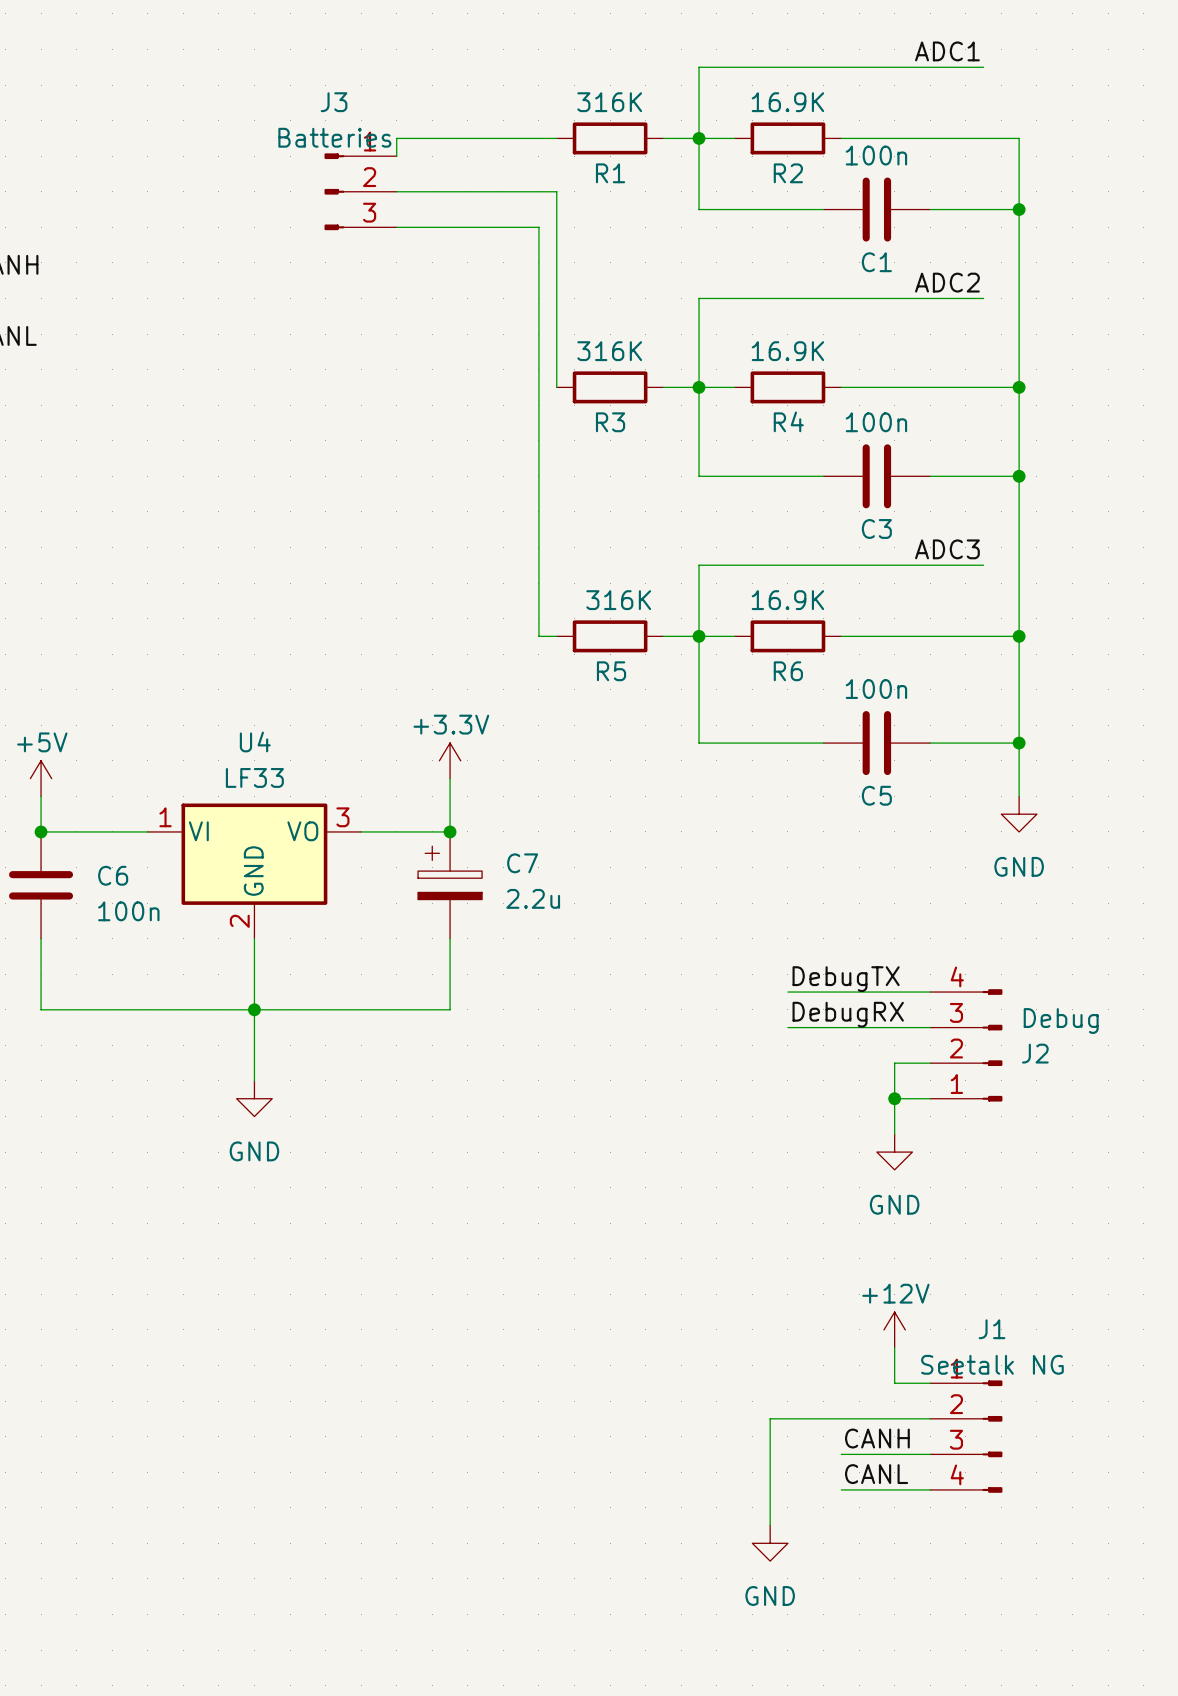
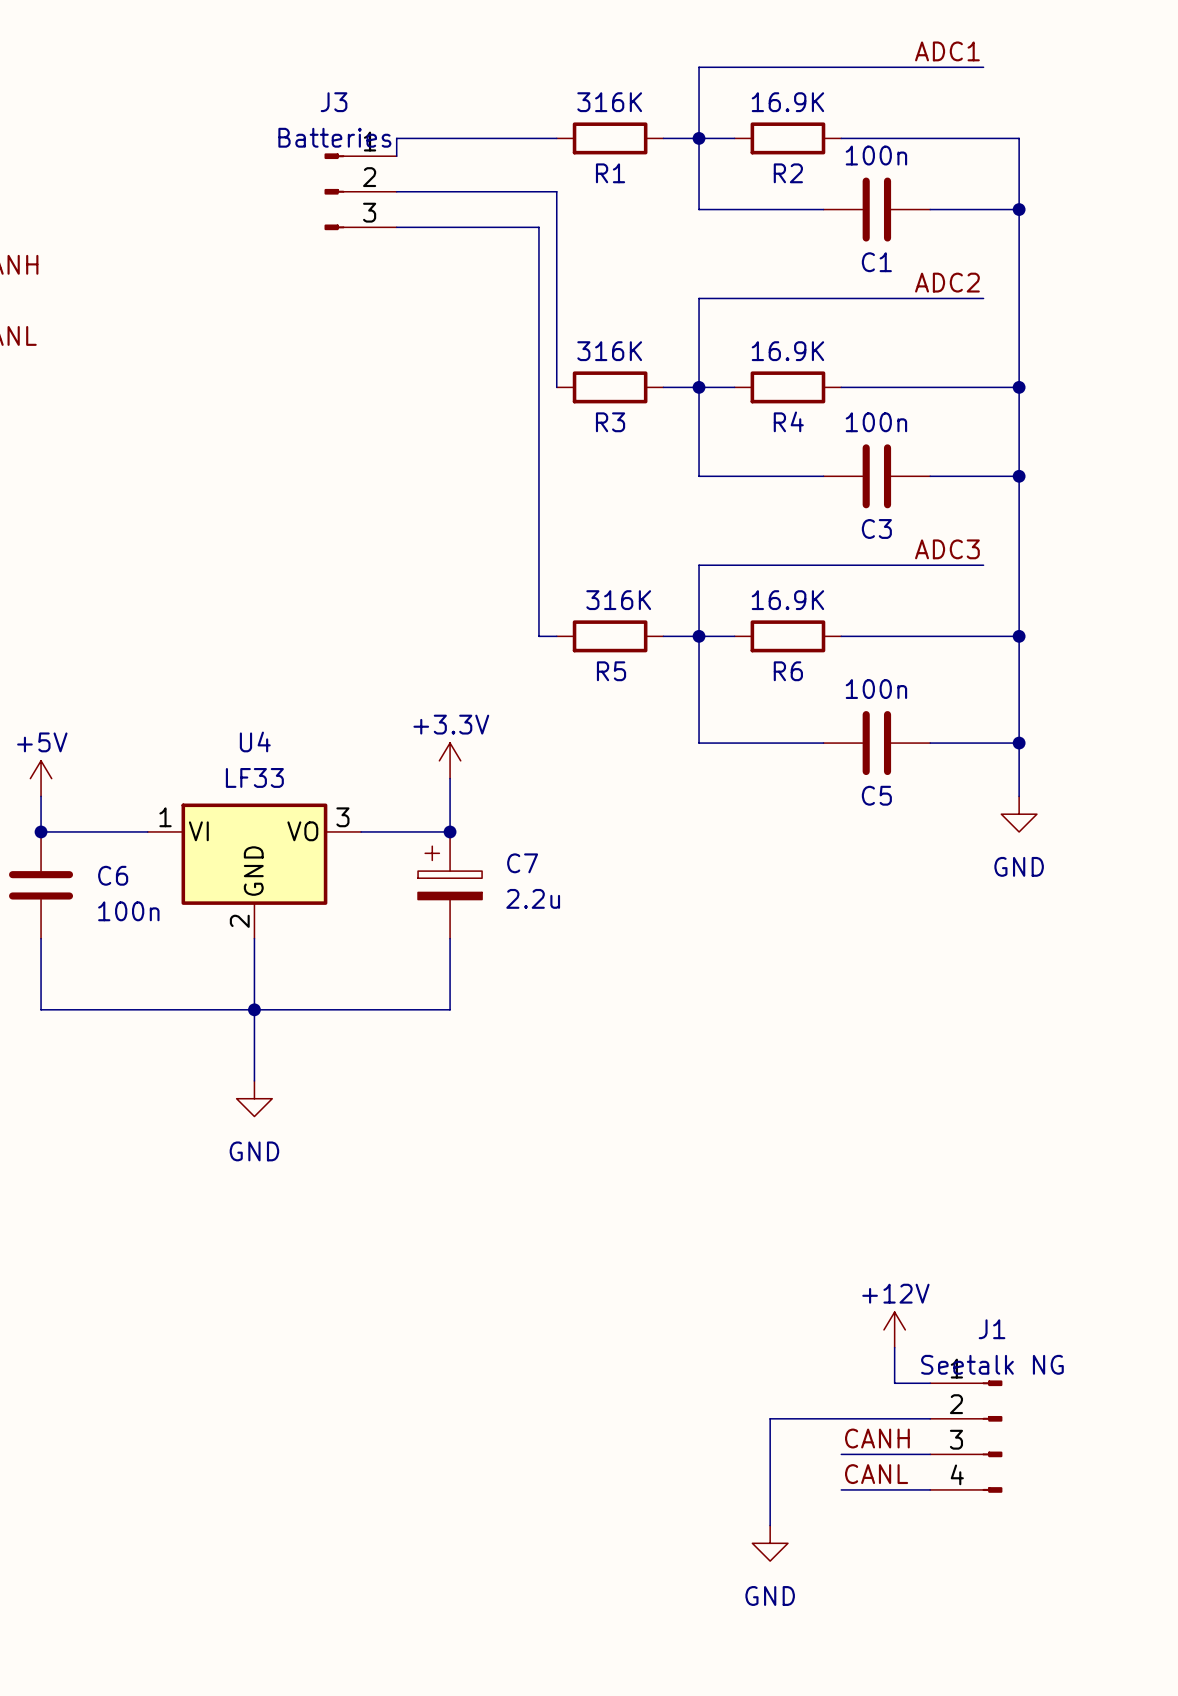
label: DebugTX (846, 979) -> none
wire: (787, 992) (930, 992) -> none
label: DebugRX (848, 1014) -> none
wire: (787, 1027) (930, 1027) -> none
J2: Debug (966, 1045) -> none
wire: (930, 1063) (894, 1063) (894, 1134) -> none
wire: (894, 1098) (930, 1098) -> none
junction: (894, 1098) -> none
power symbol: GND (894, 1152) -> none

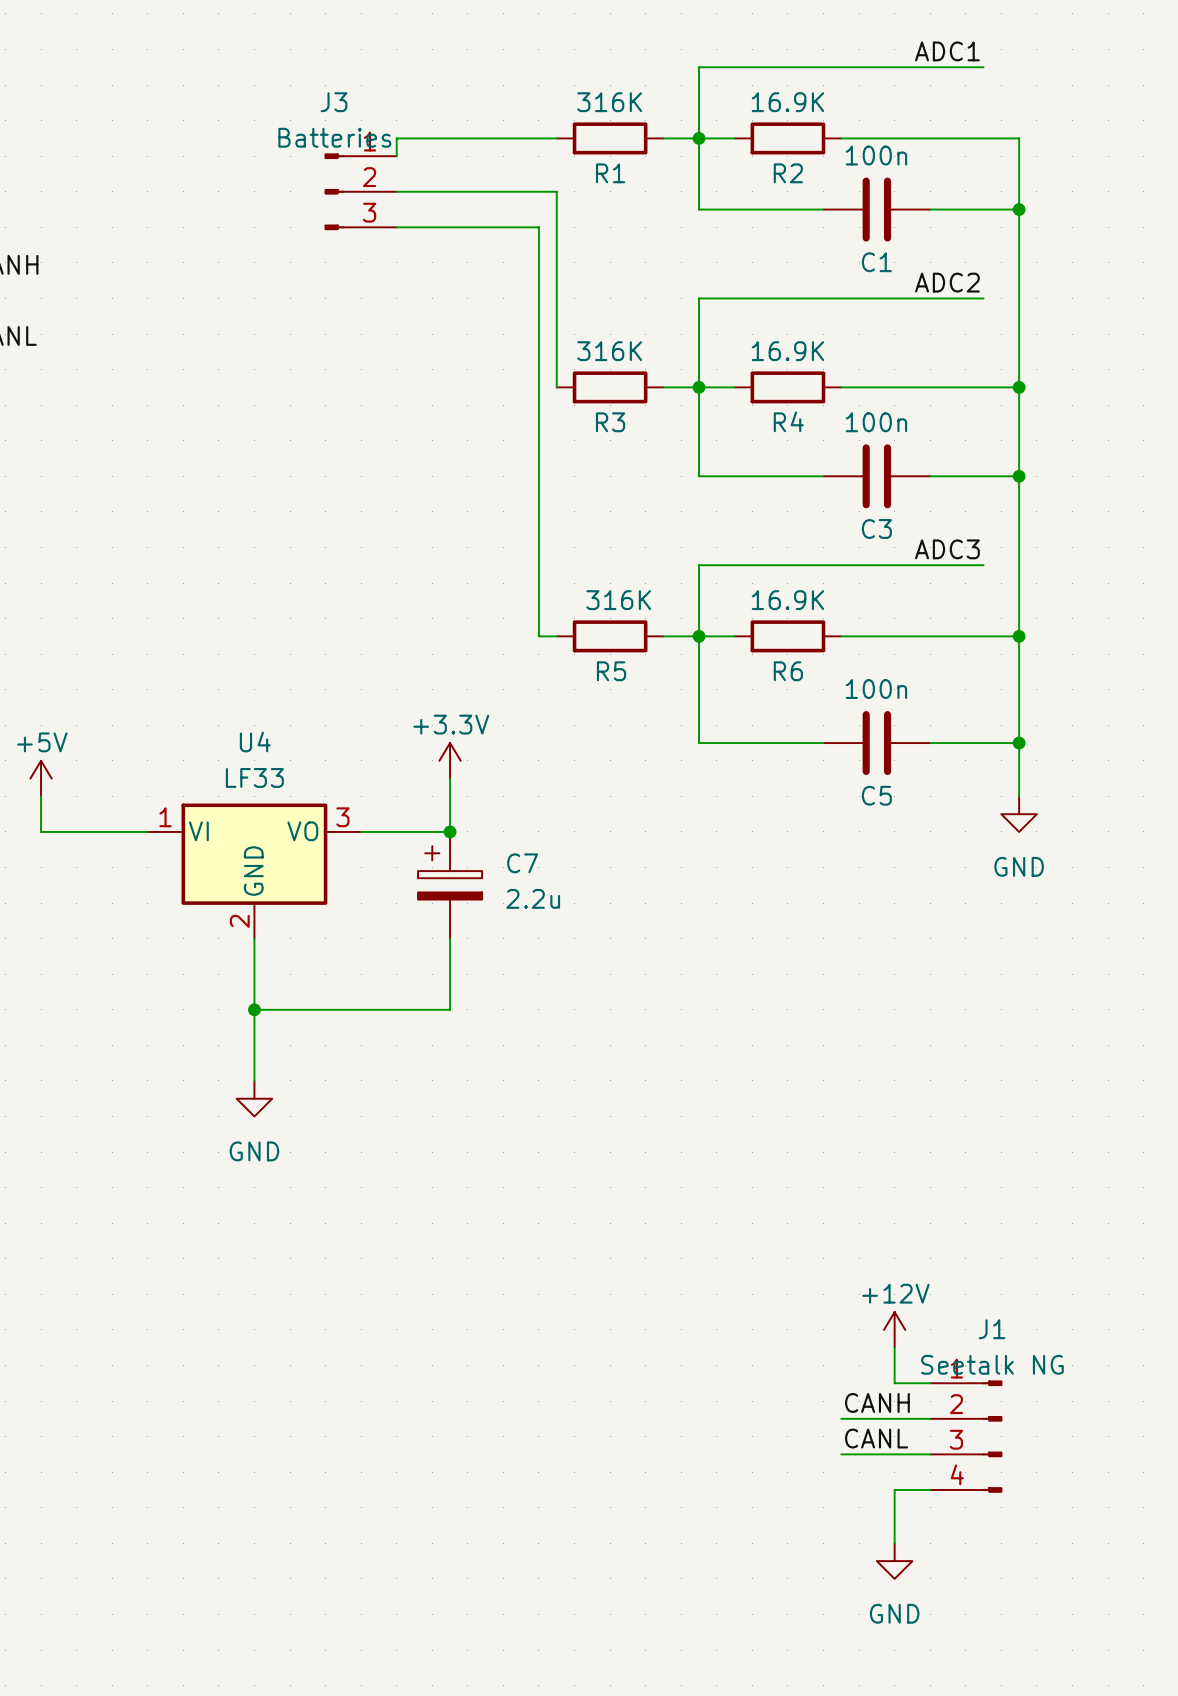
junction: (41, 831) -> none
C6: 100n (41, 885) -> none
wire: (41, 938) (41, 1009) (254, 1009) -> none
label: none -> CANH (877, 1402)
wire: (841, 1418) (770, 1418) (770, 1525) -> none
label: CANH (877, 1438) -> CANL (876, 1438)
label: CANL (876, 1474) -> none
wire: (841, 1489) (894, 1489) -> (894, 1543) (894, 1489)
power symbol position: GND (770, 1543) -> GND (894, 1561)

